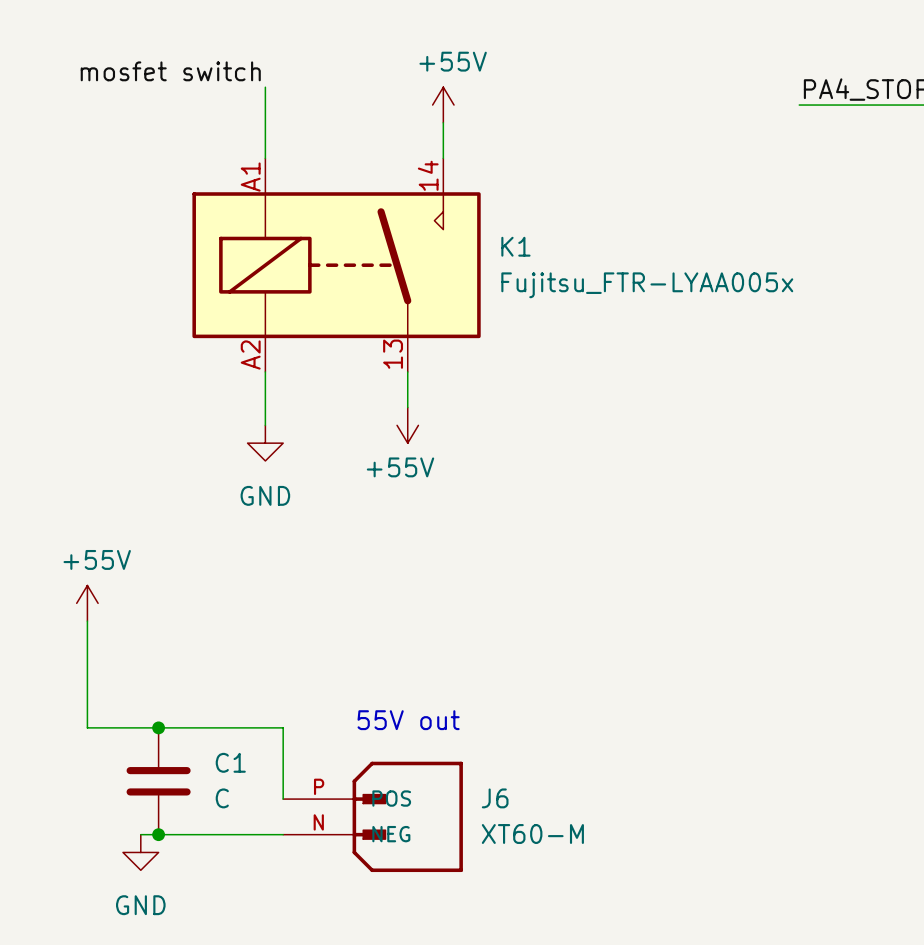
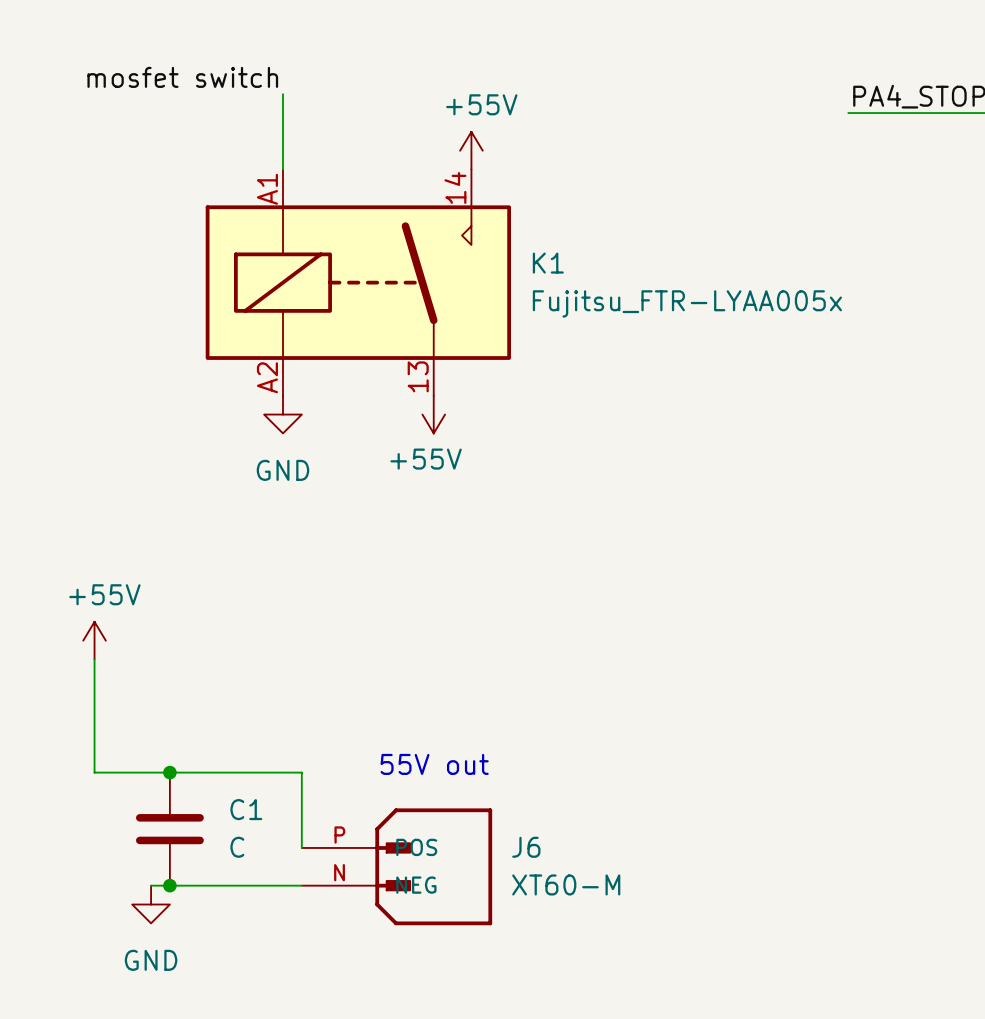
power symbol position: +55V (443, 105) -> +55V (471, 150)
wire: (265, 371) (265, 425) -> none
power symbol position: +55V (407, 425) -> +55V (433, 414)
power symbol position: GND (265, 443) -> GND (282, 414)

